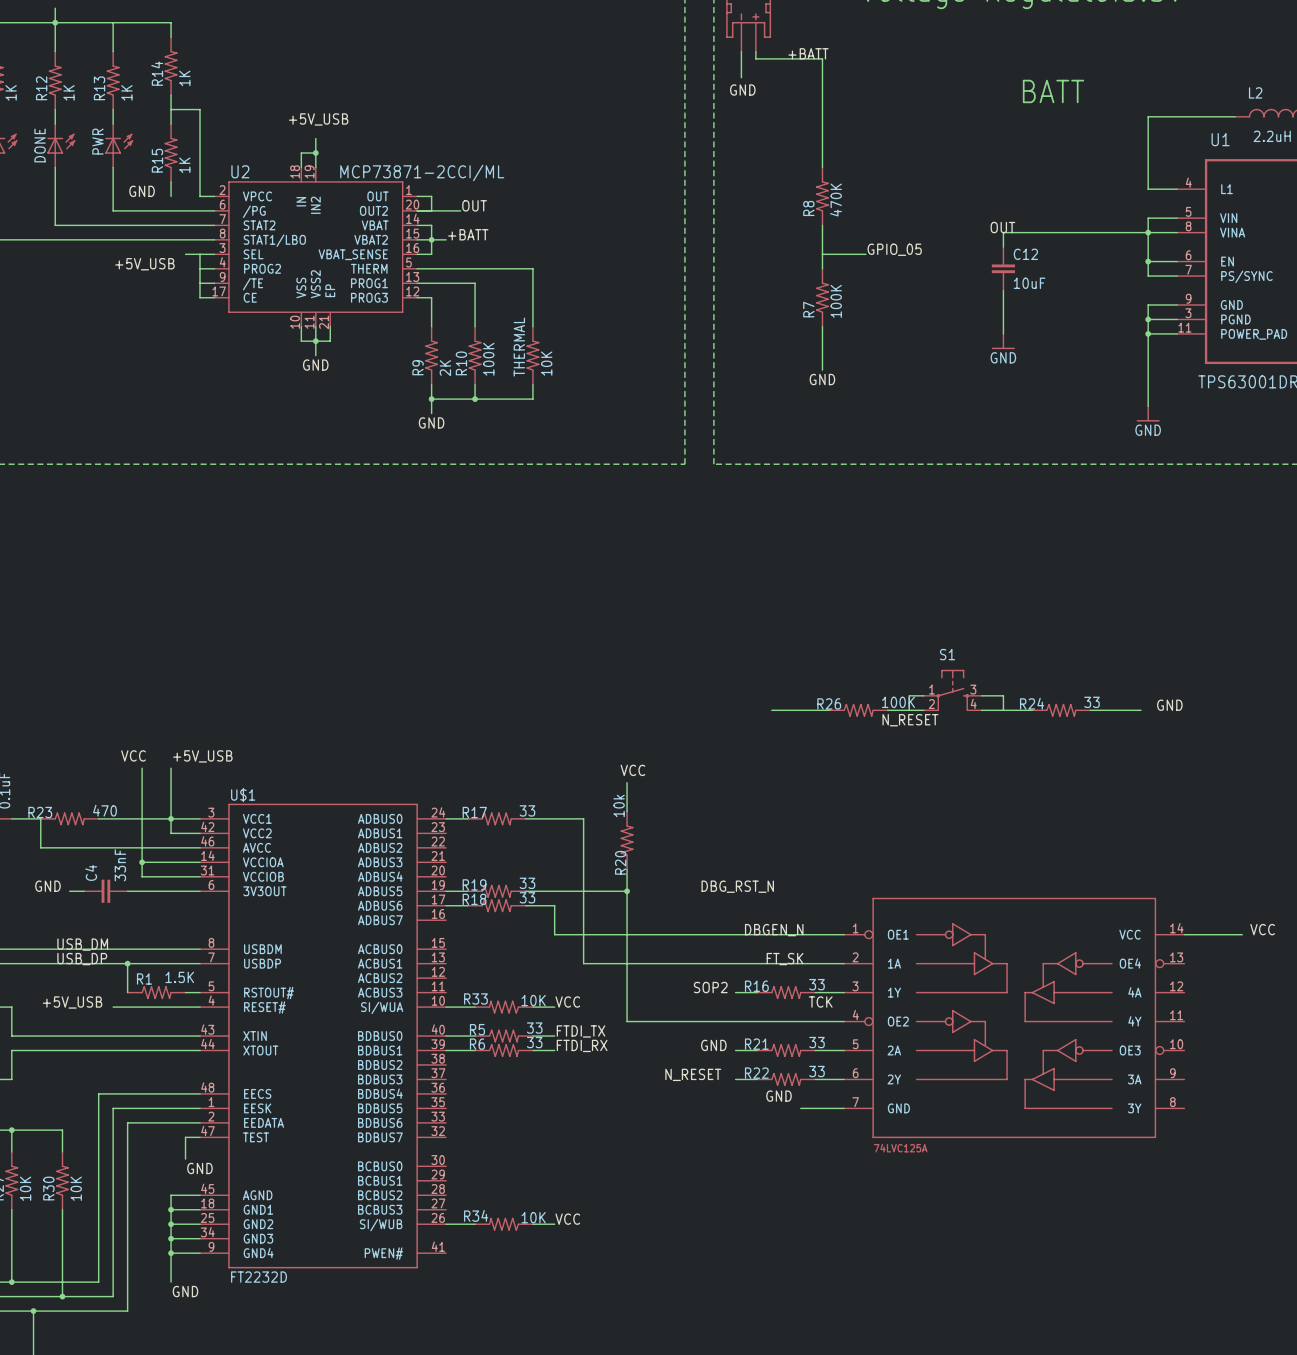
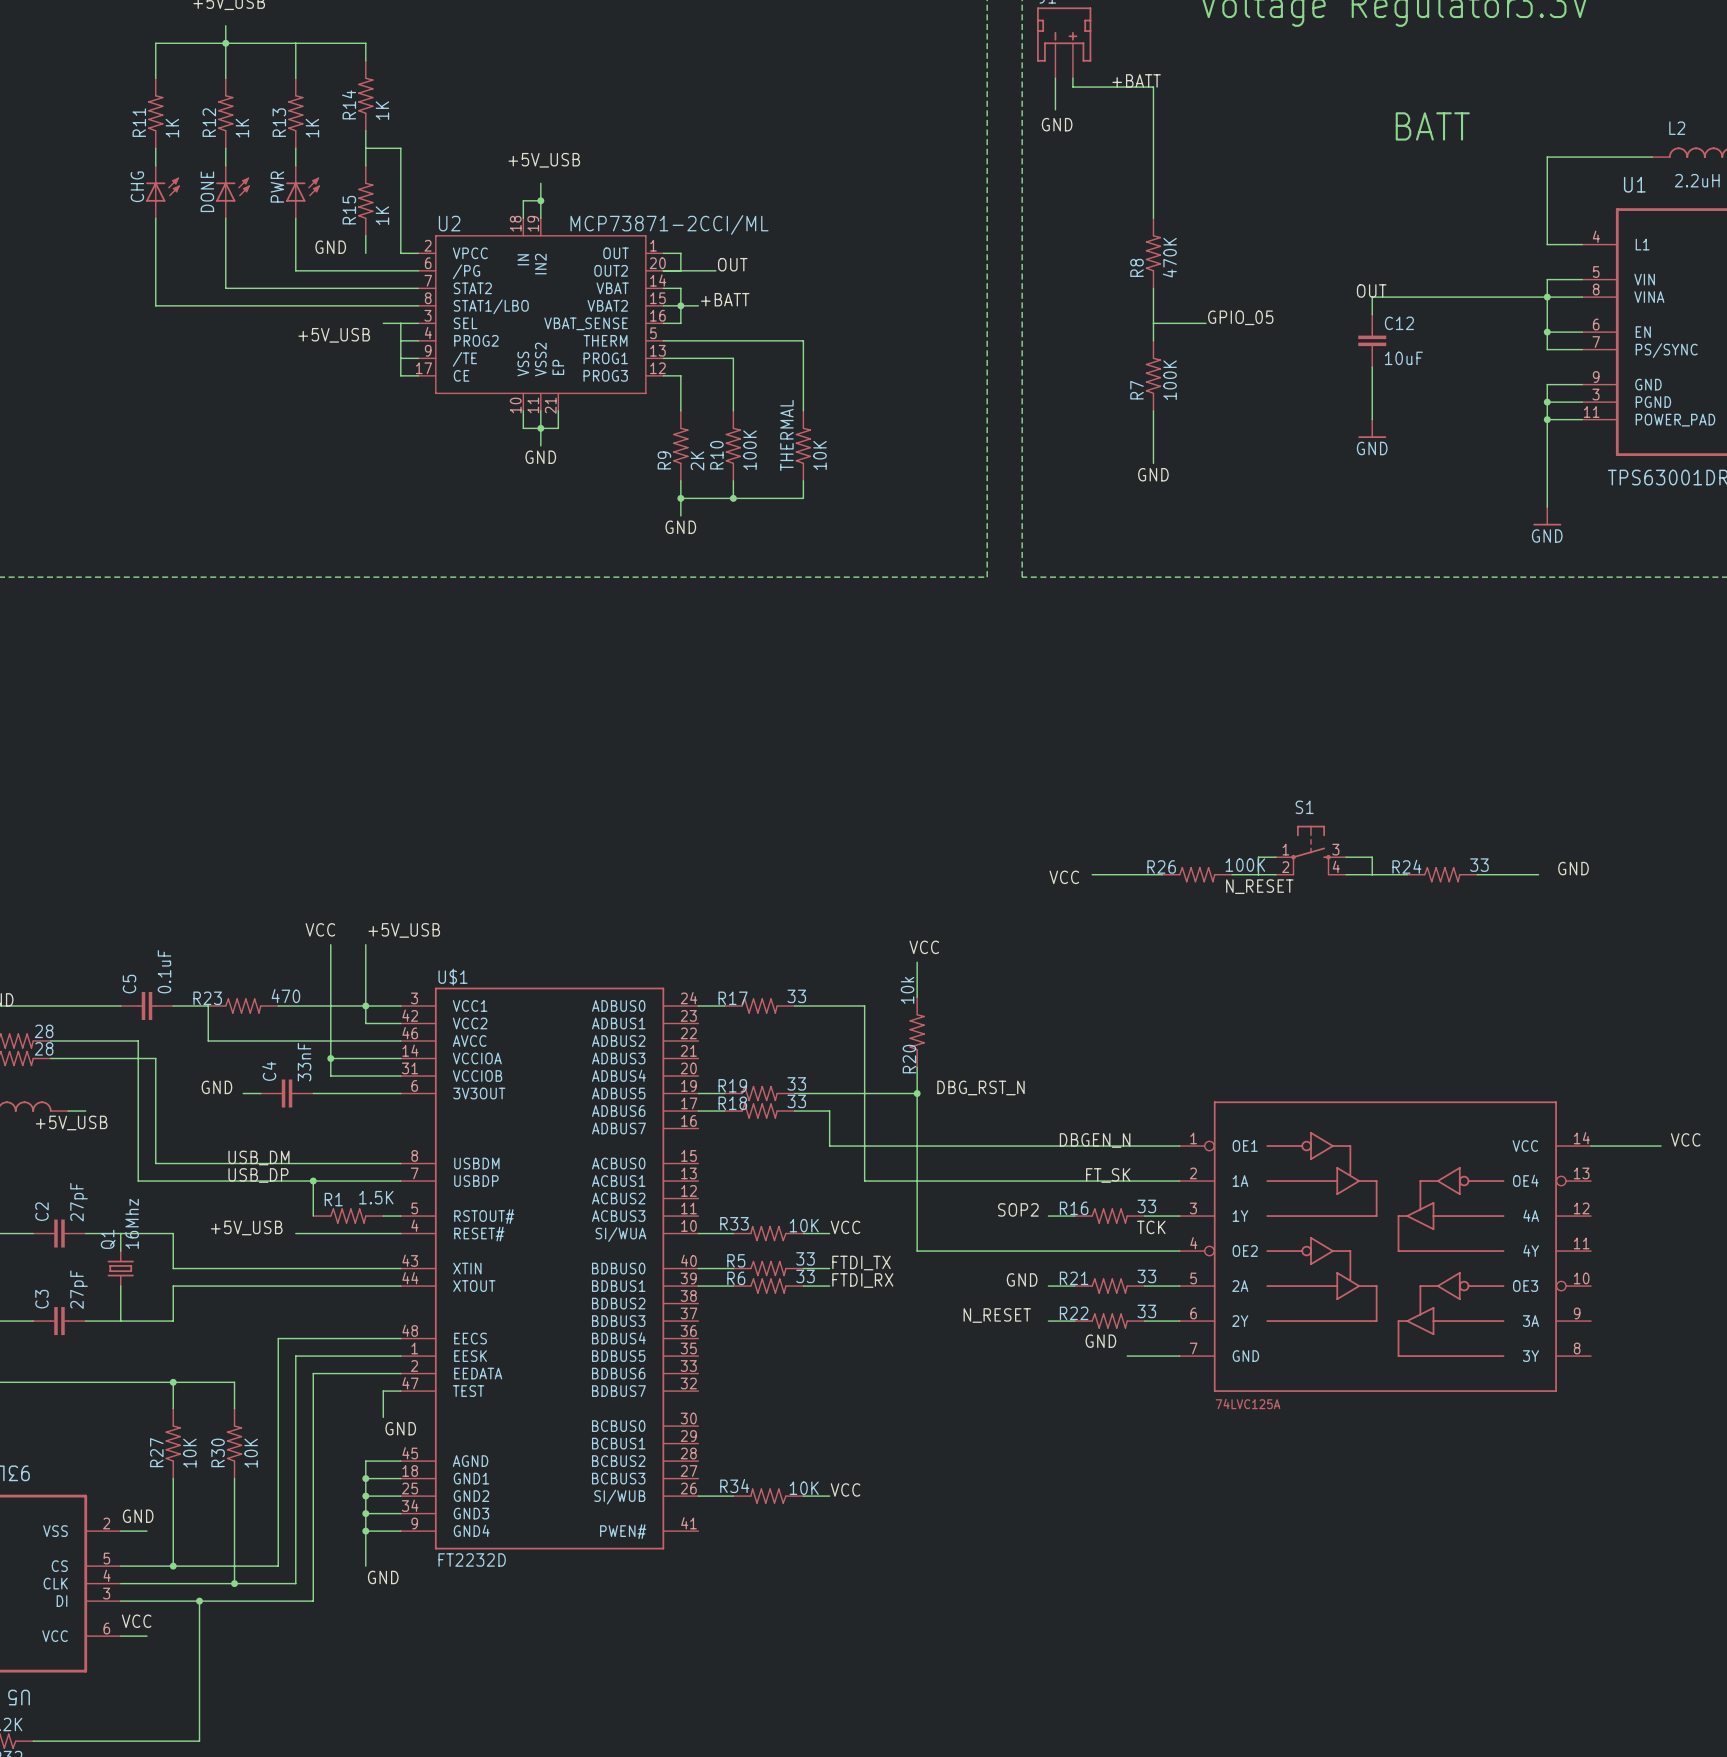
label: none -> VCC (1064, 877)
label position: DBG_RST_N (737, 886) -> DBG_RST_N (980, 1087)

